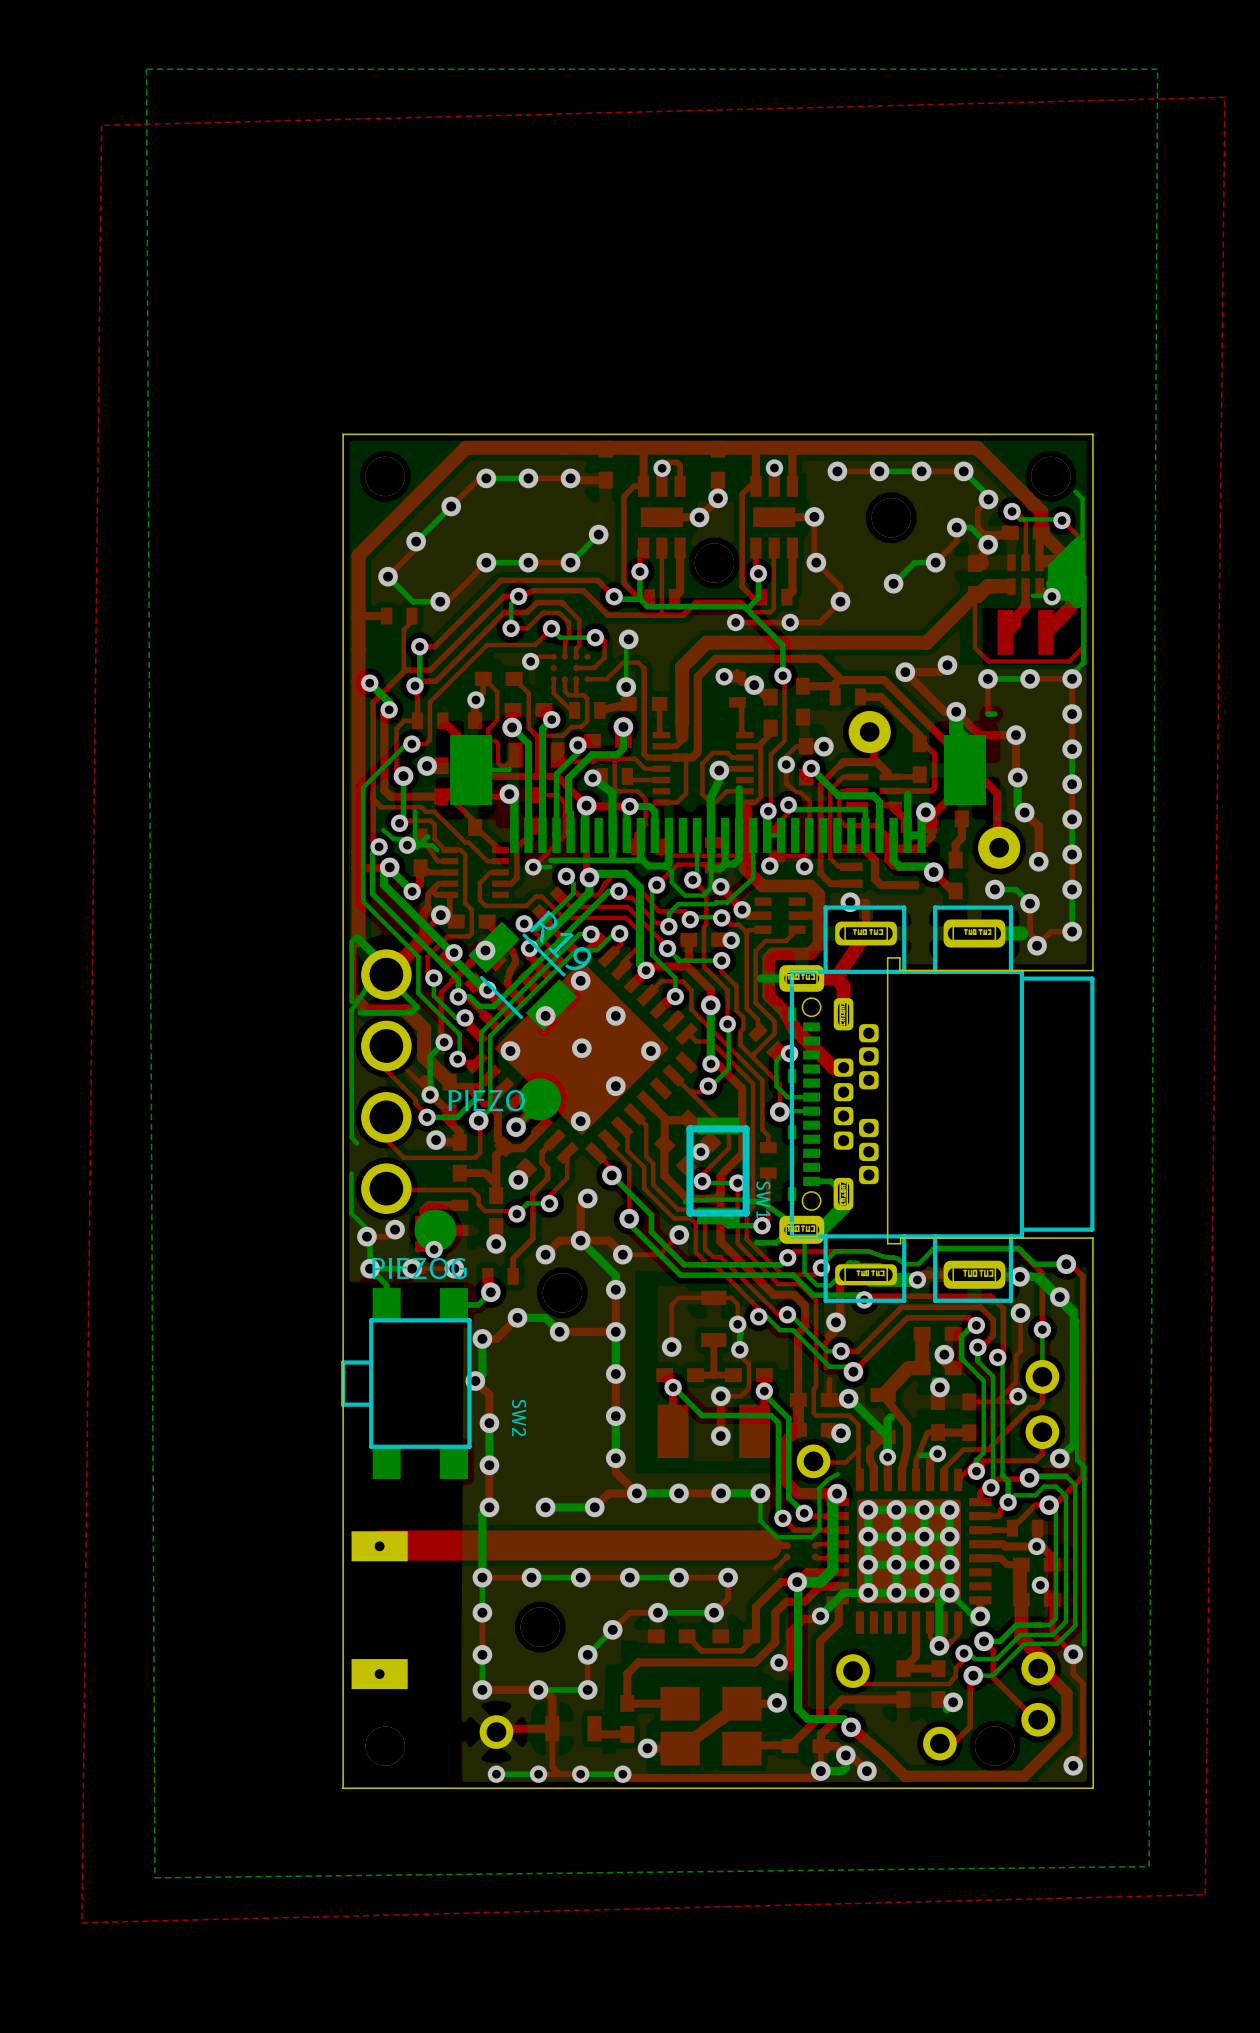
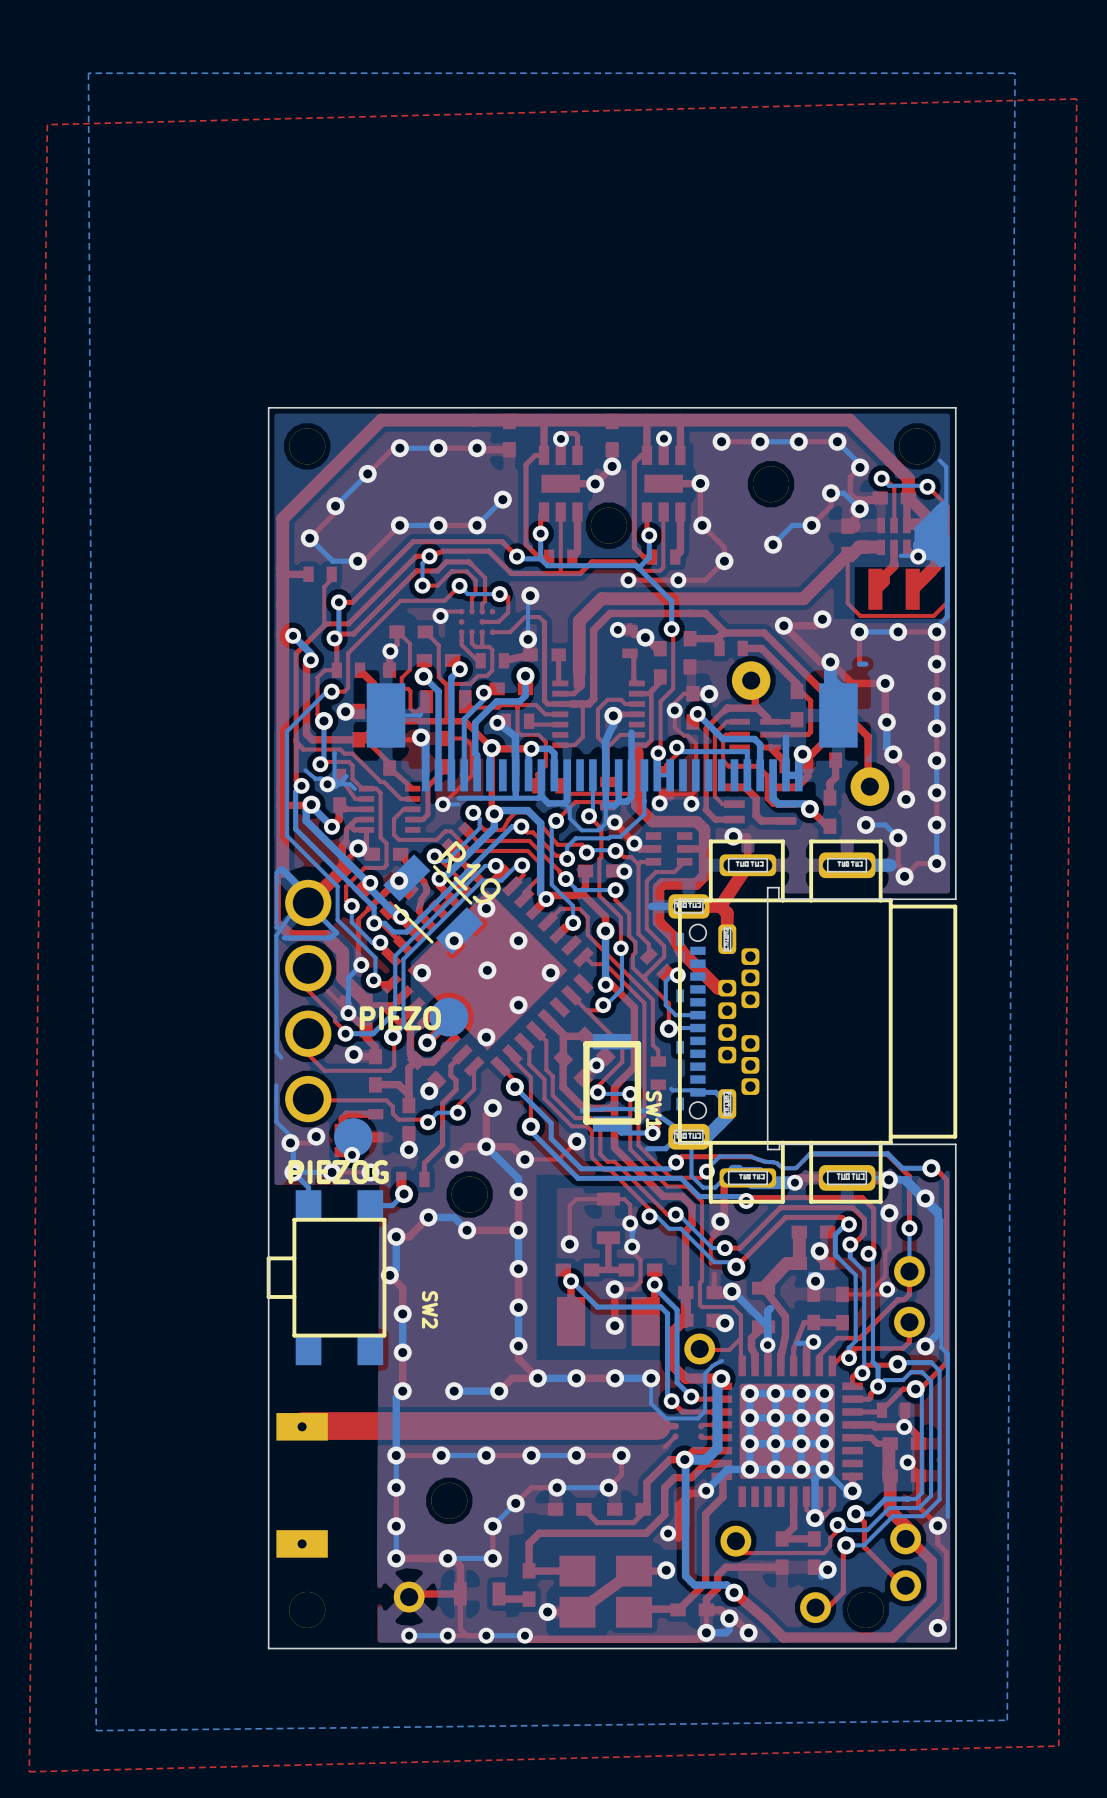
bottom track: none -> (671, 1088) (697, 1092)

